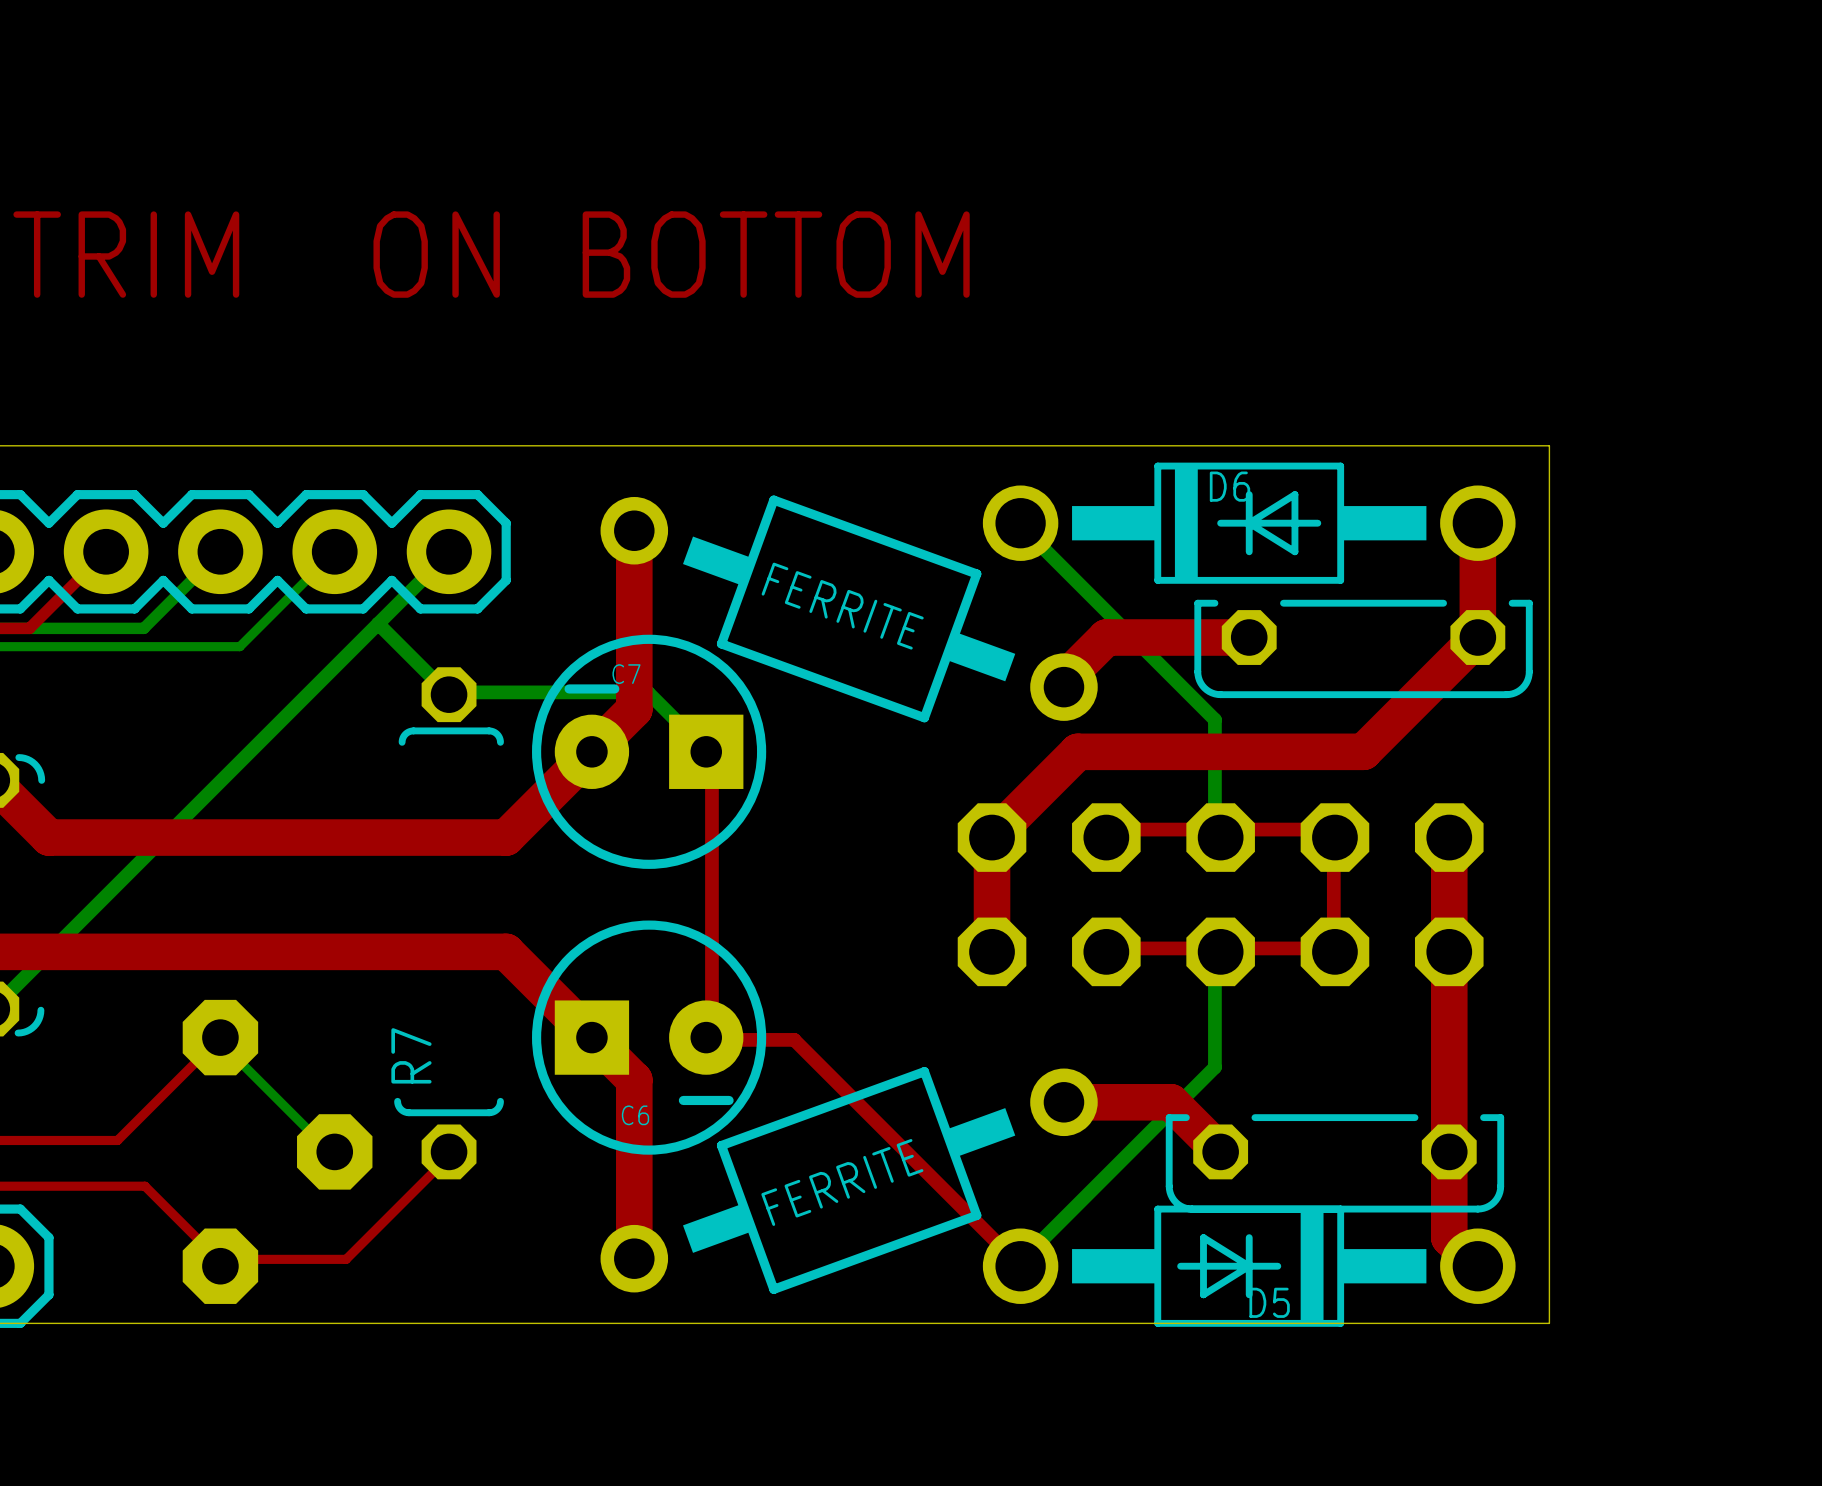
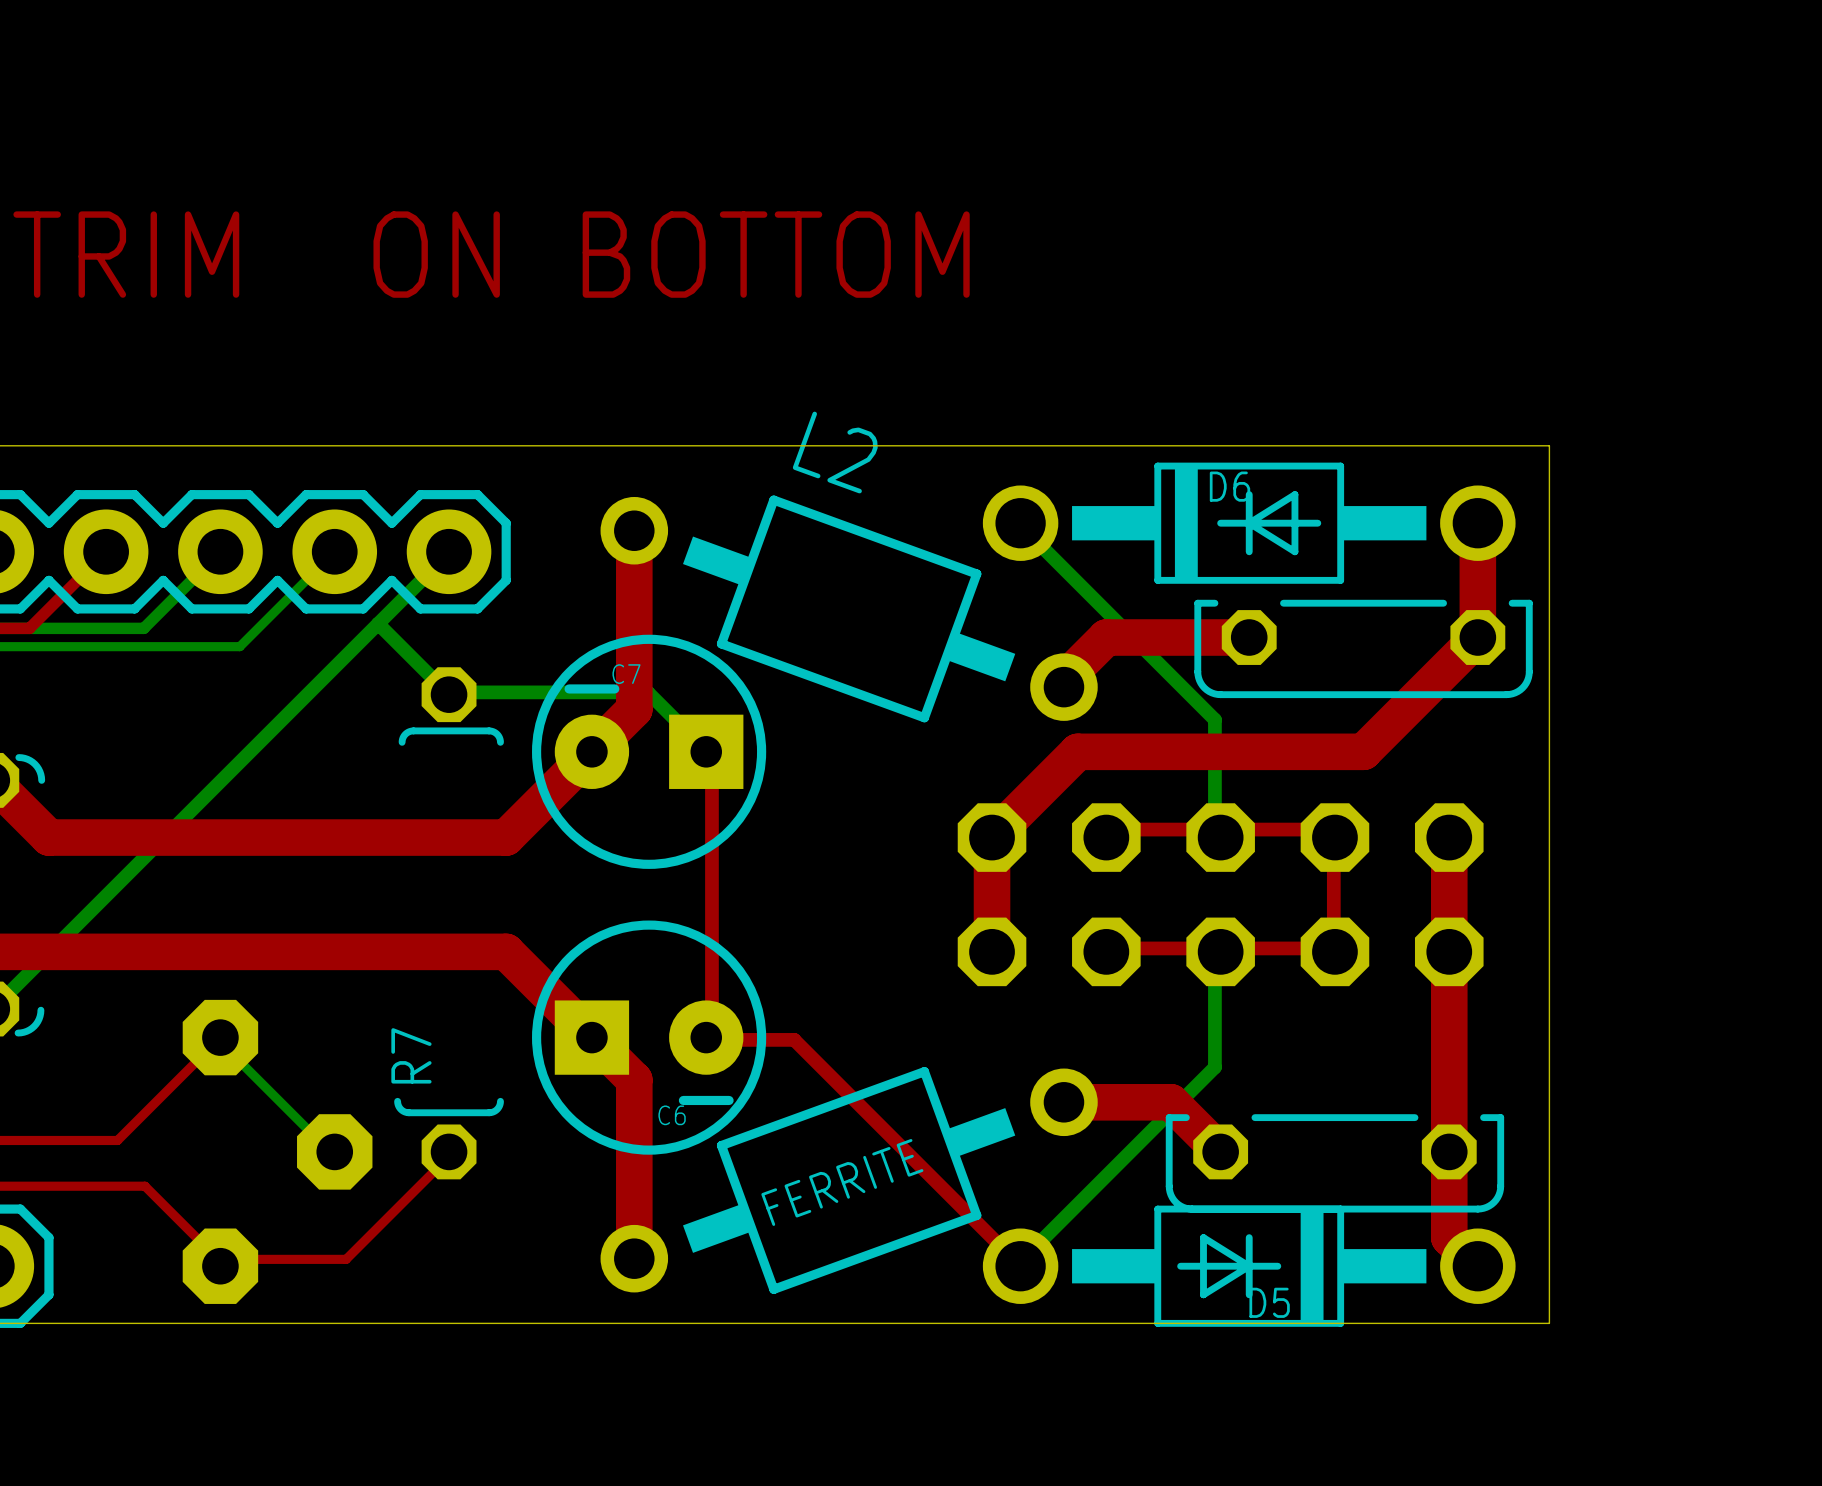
L2 name: none -> L2 (835, 452)
L2 text: FERRITE (842, 606) -> none
C6 name position: C6 (635, 1115) -> C6 (672, 1115)

